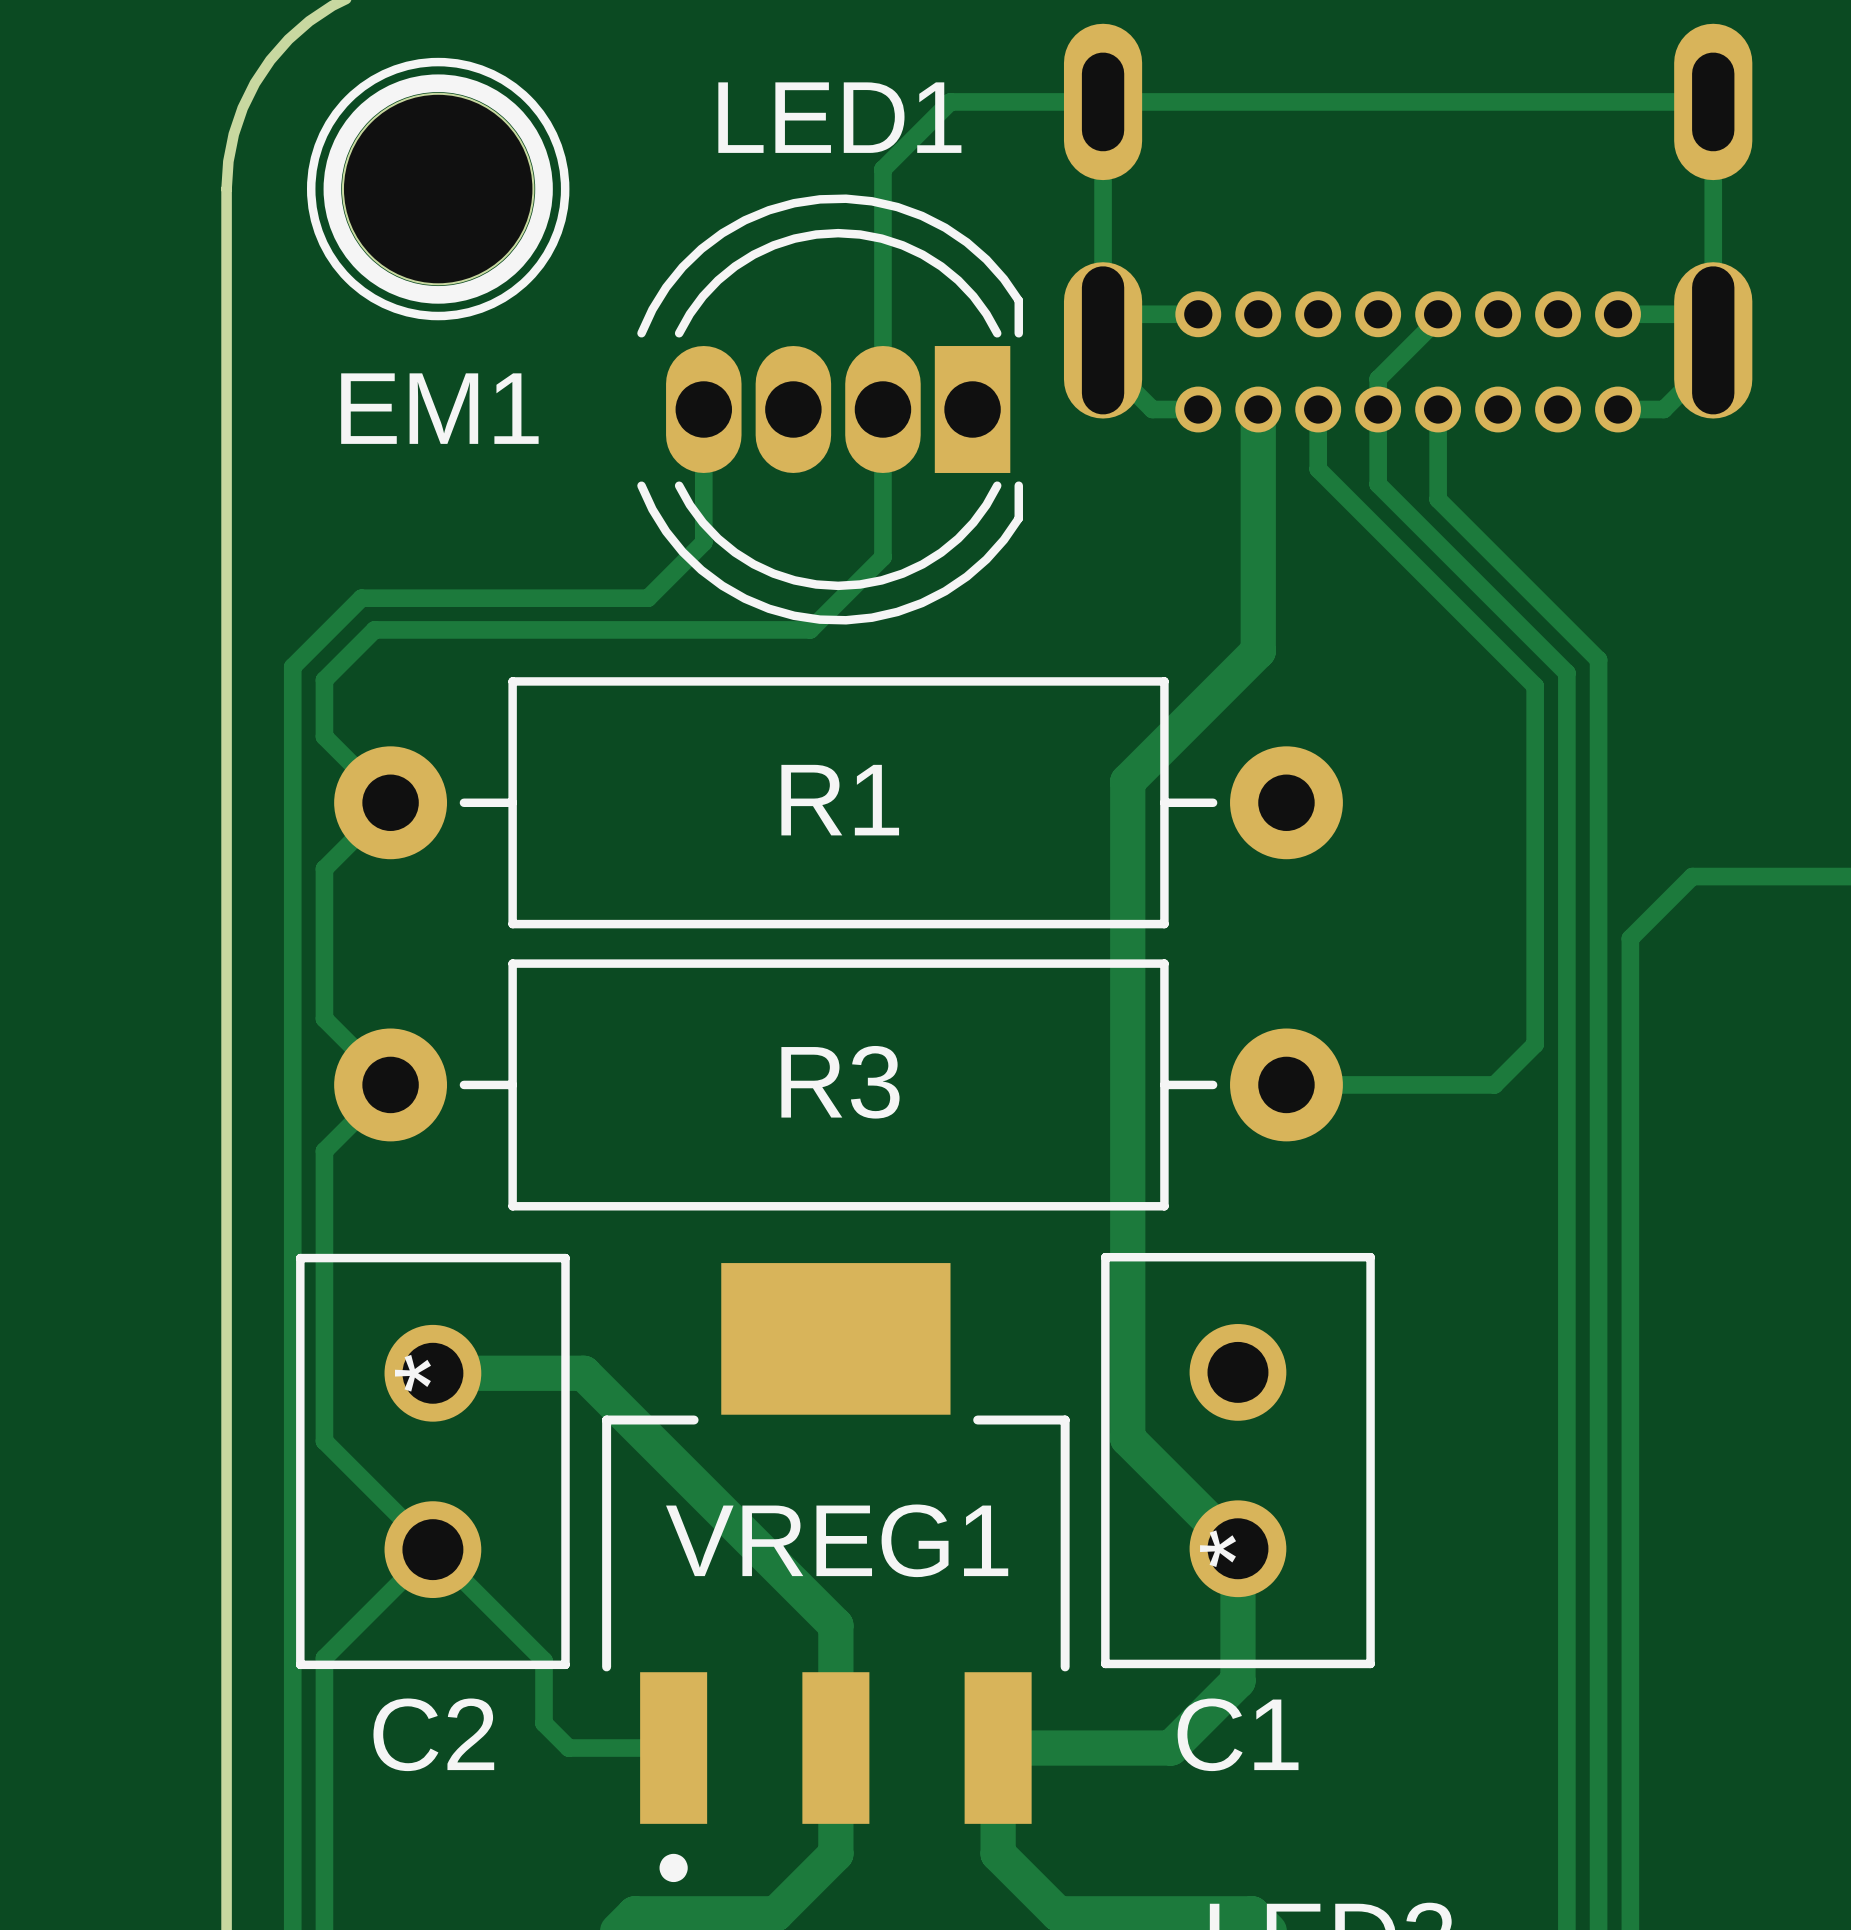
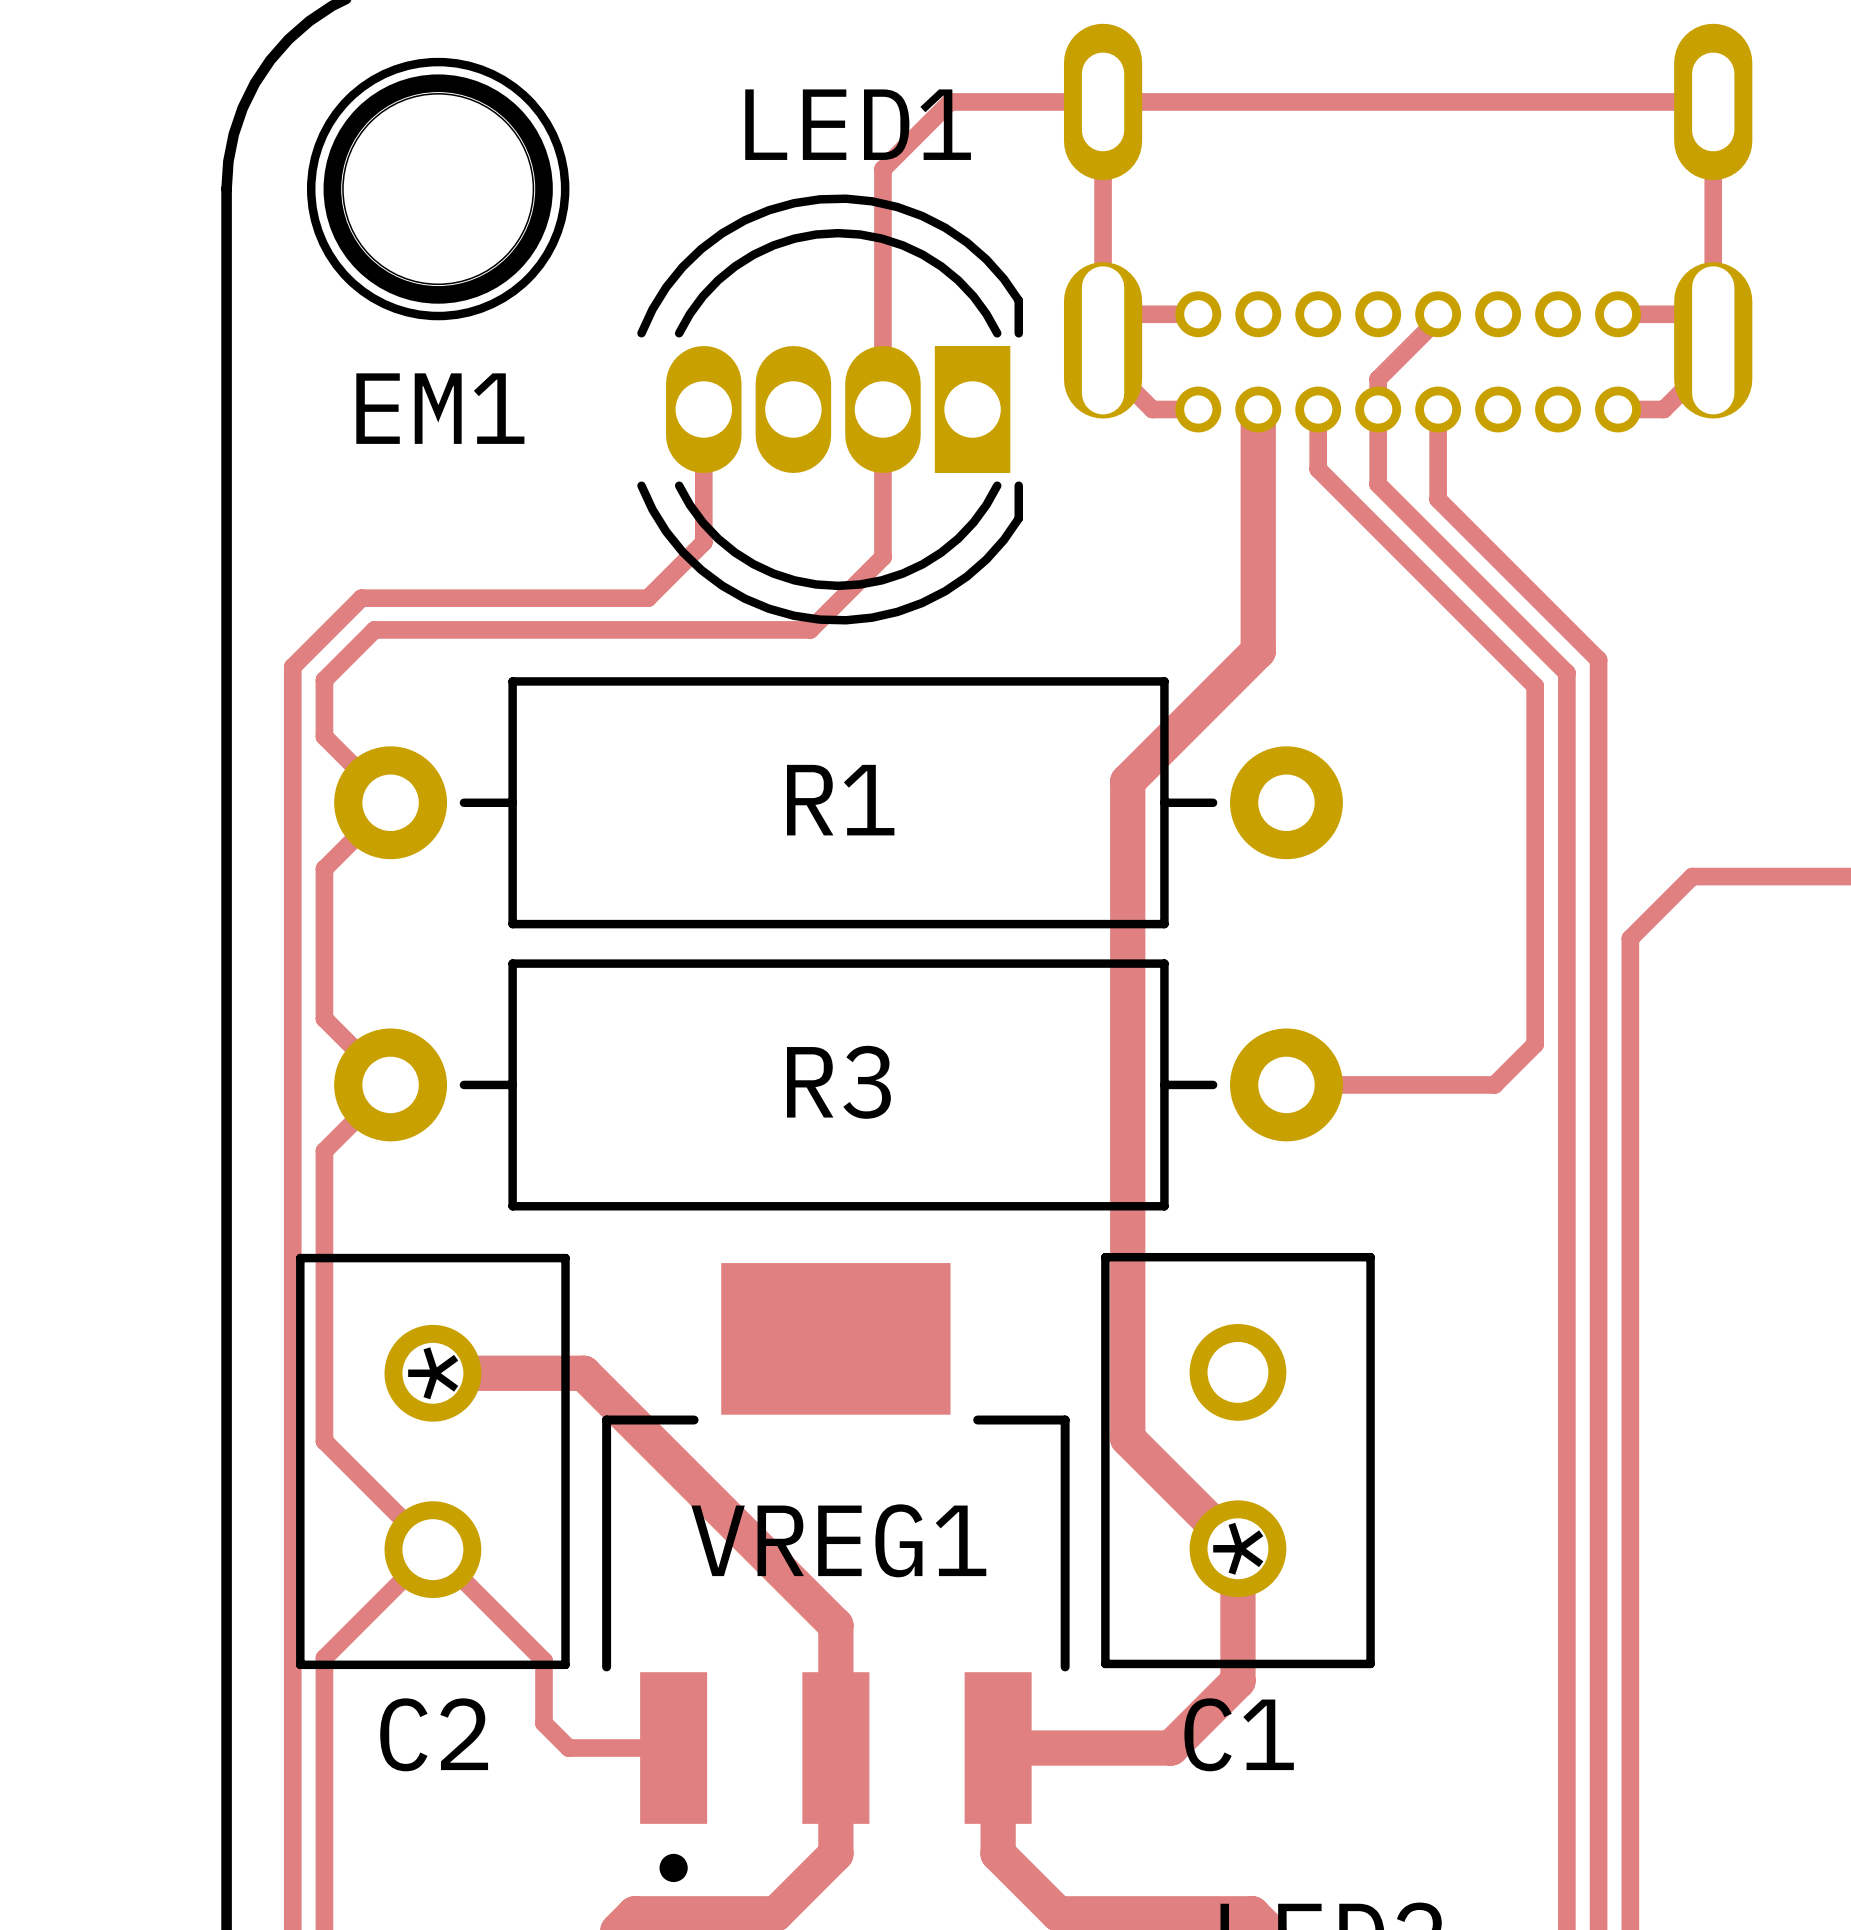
LED1 name position: LED1 (839, 117) -> LED1 (858, 124)

